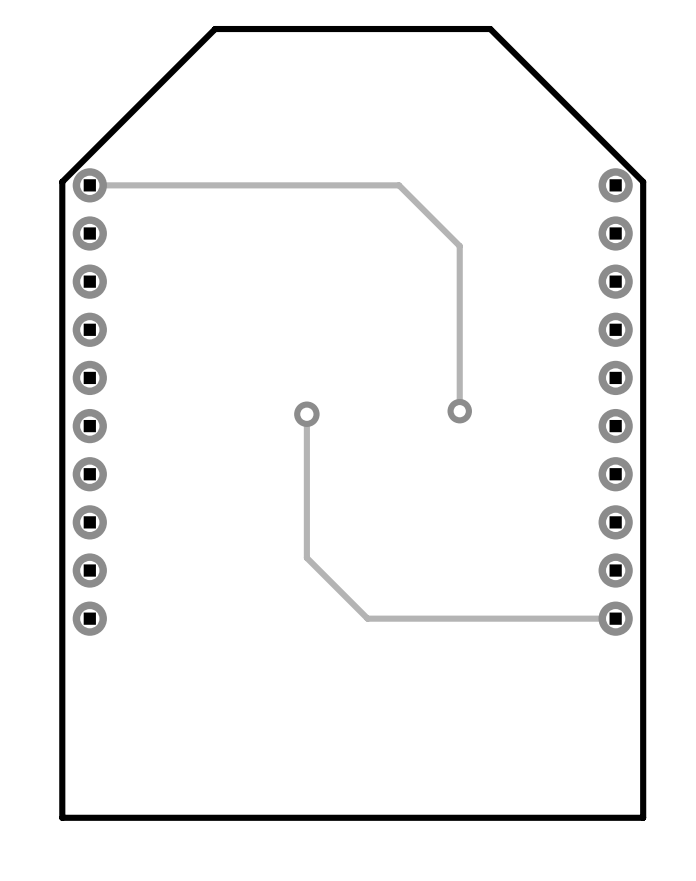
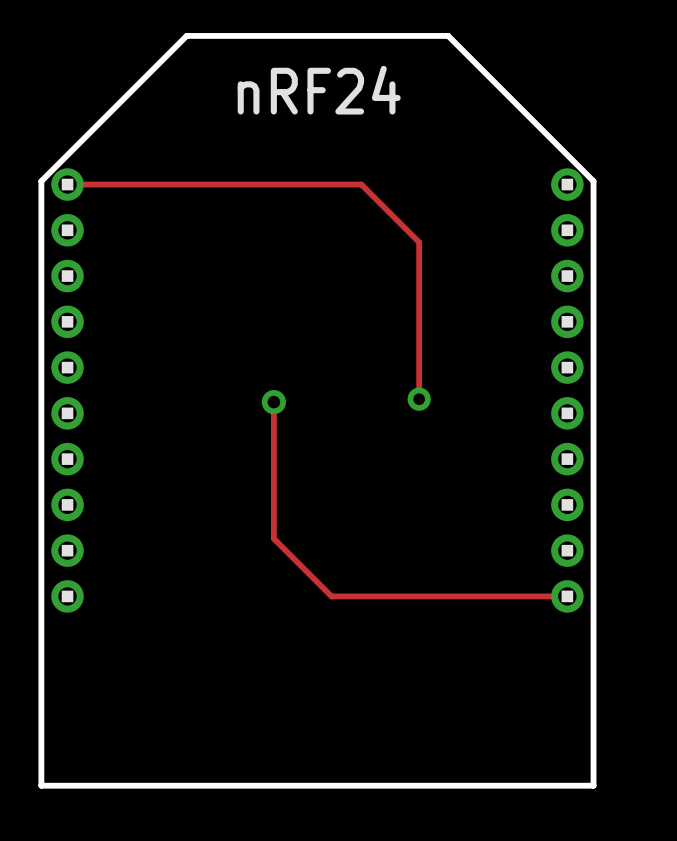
text: none -> nRF24 (319, 90)

